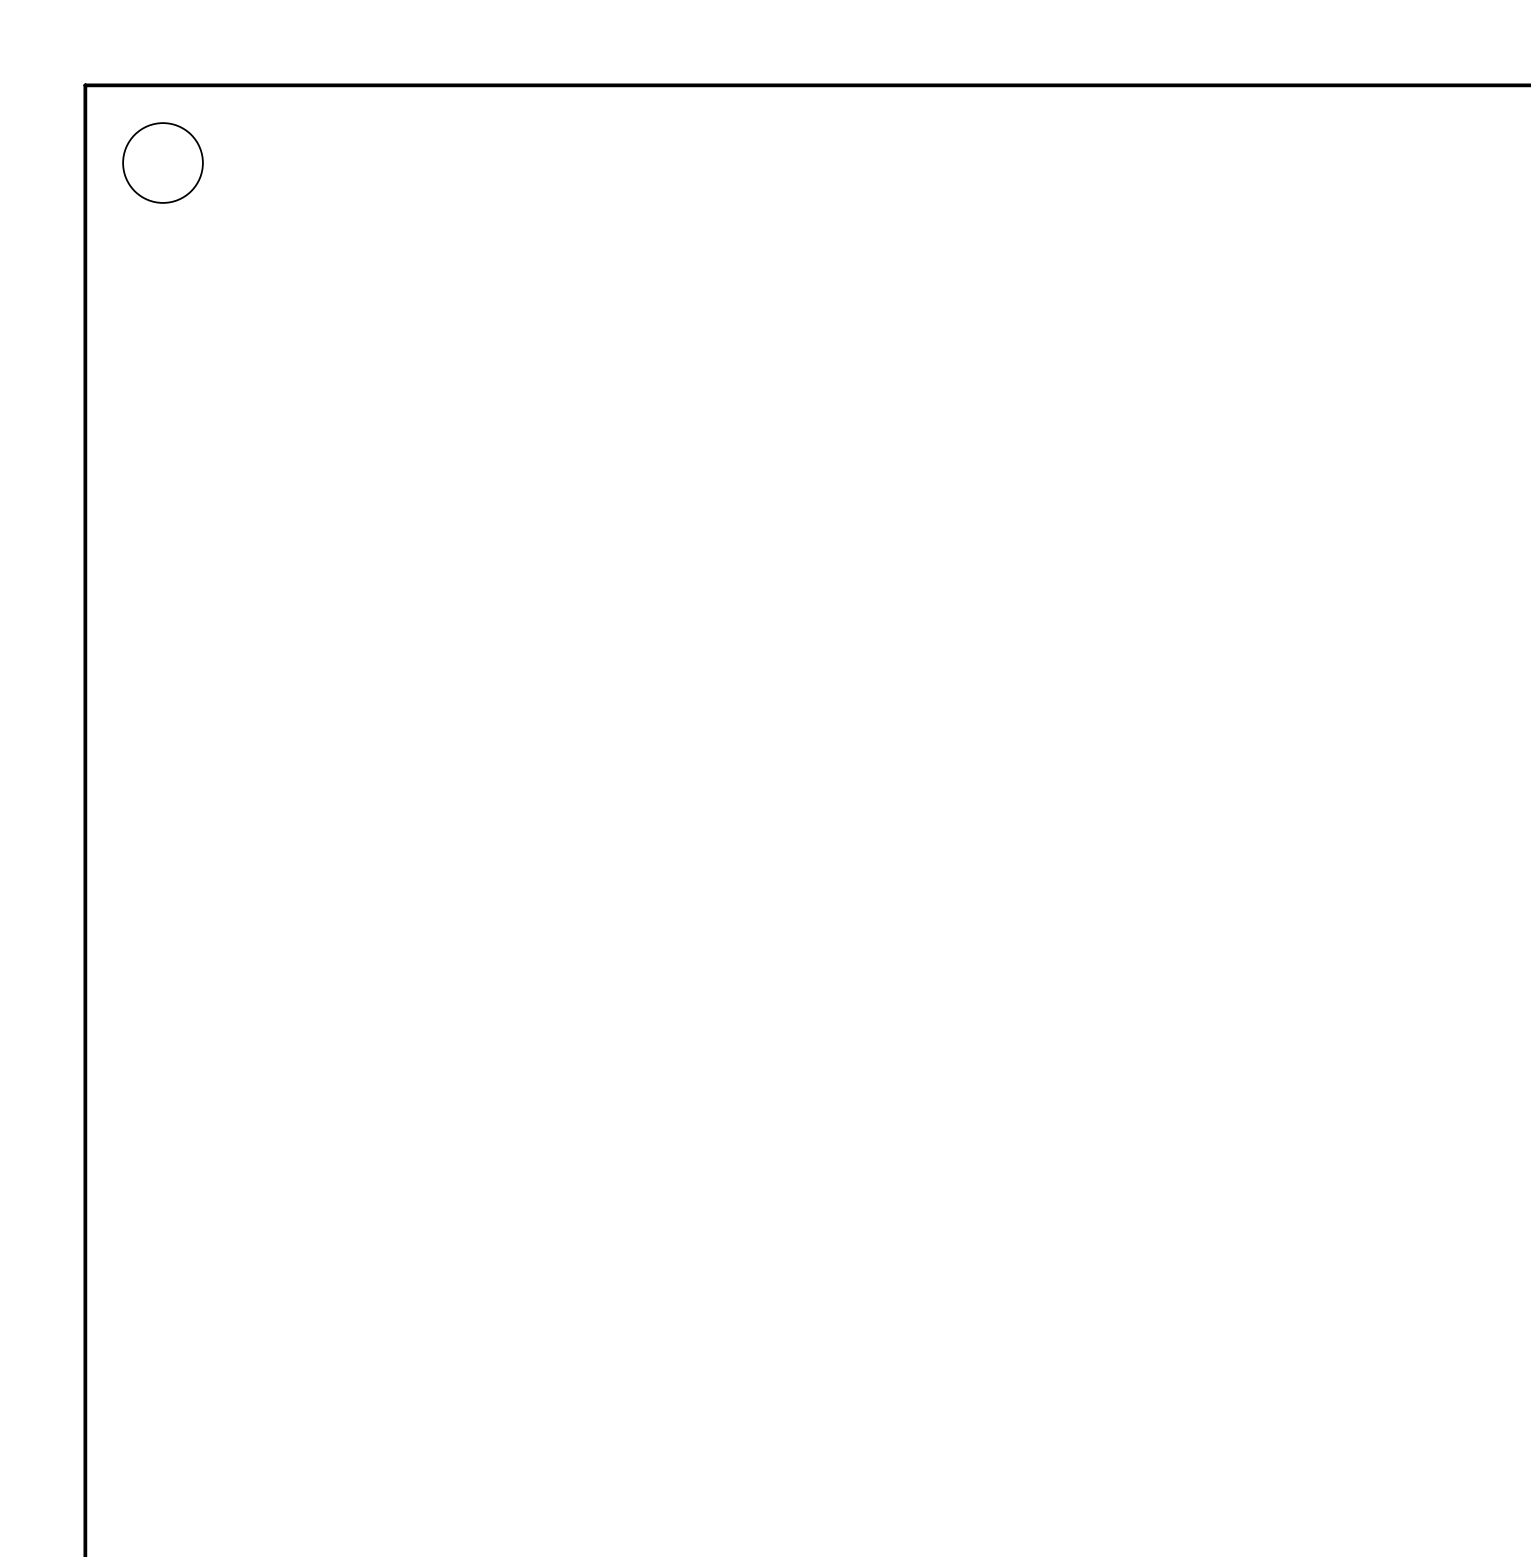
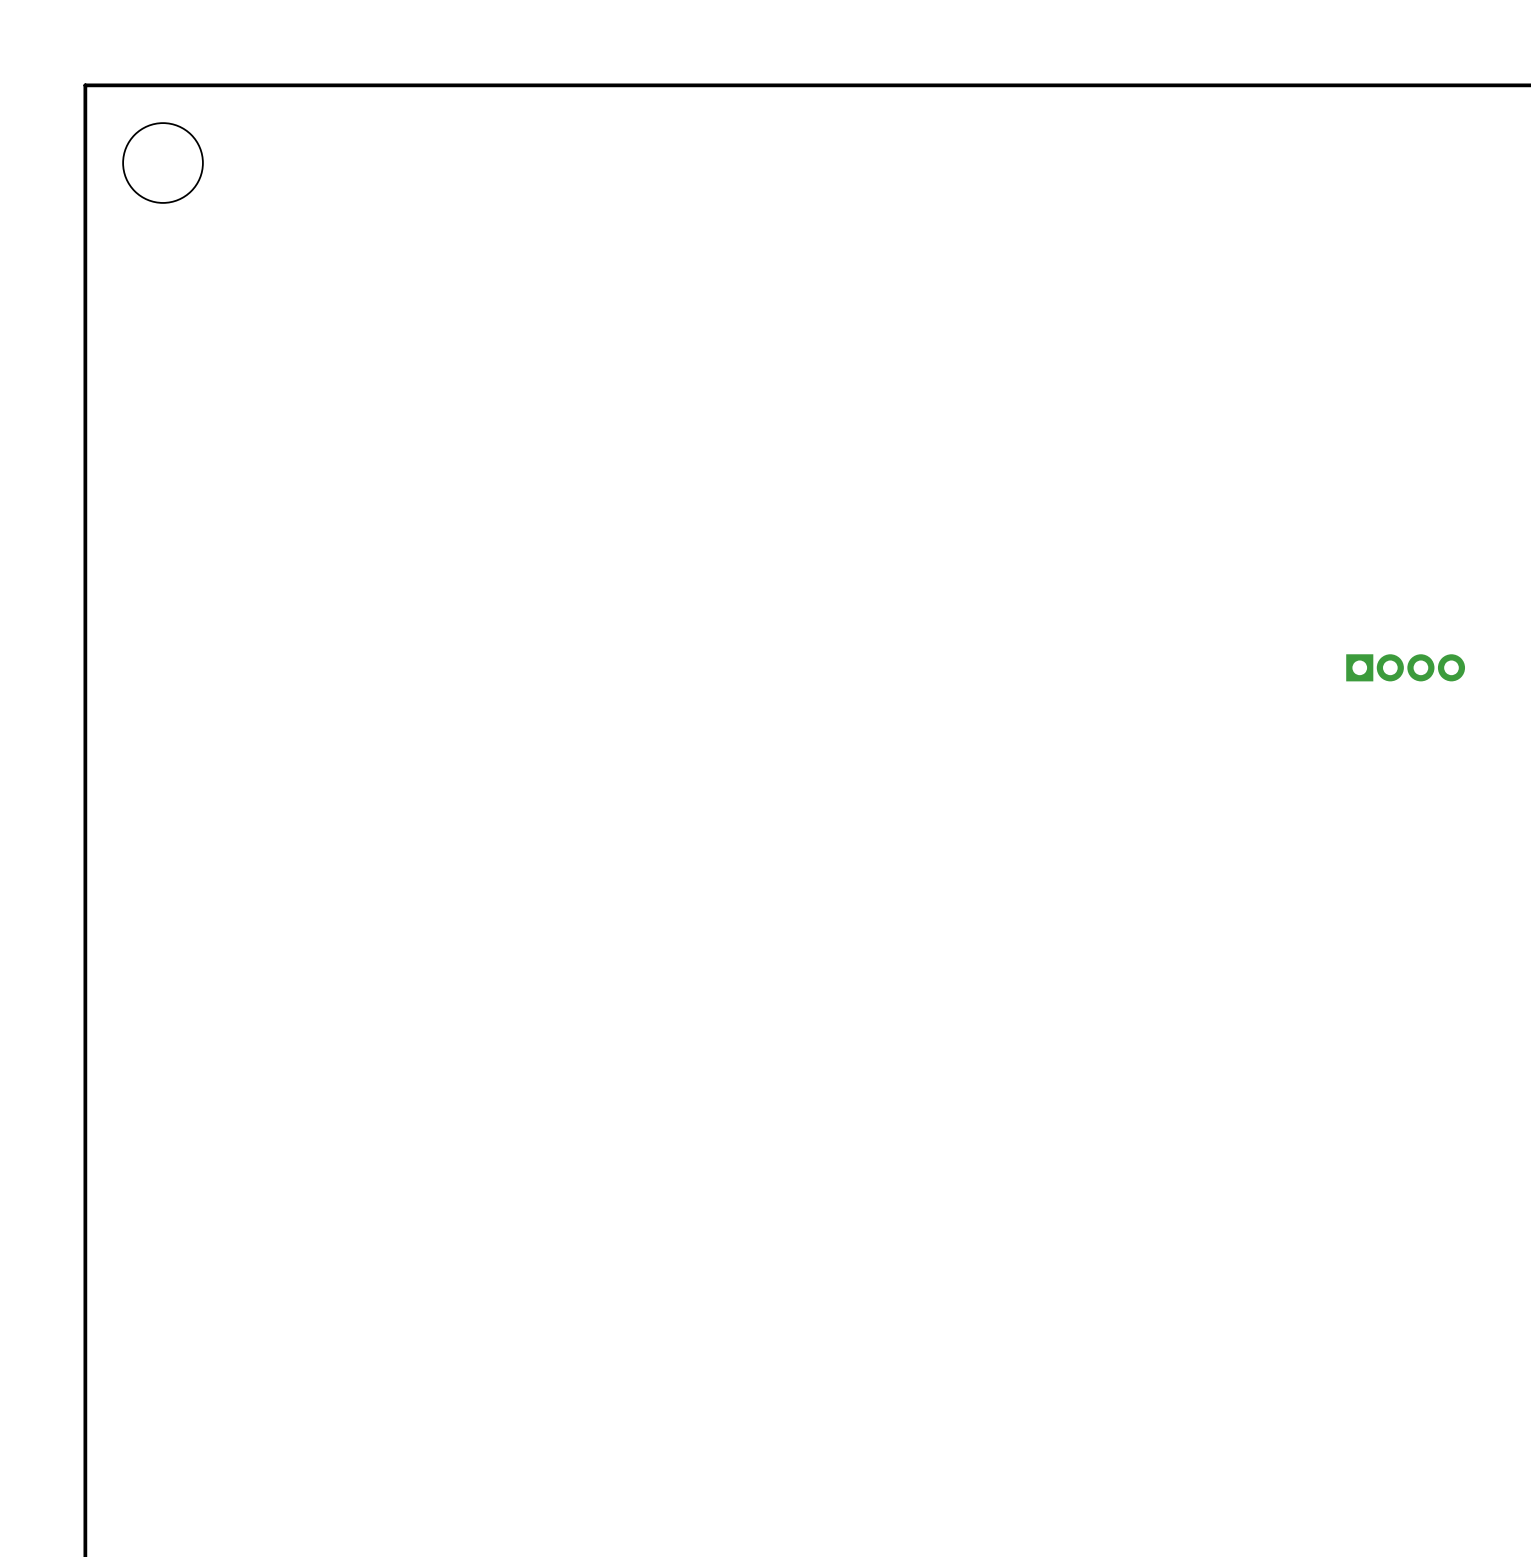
part: none -> (1405, 667)

